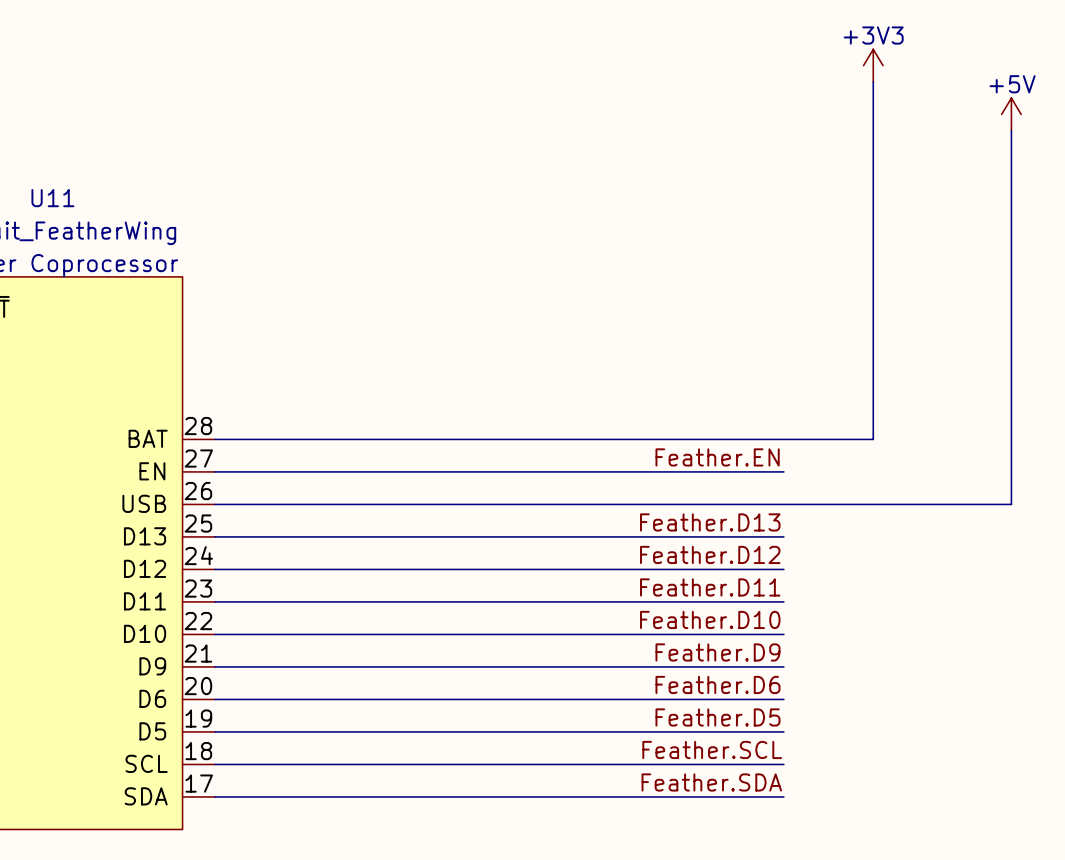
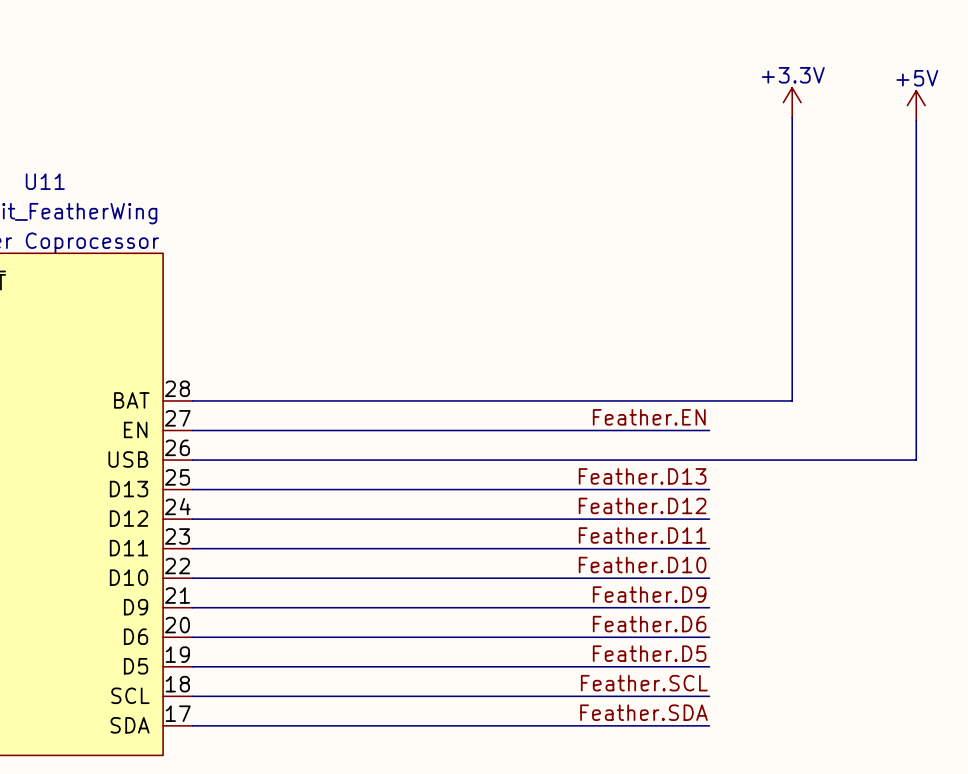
power symbol: +3V3 (873, 65) -> none
wire: (873, 81) (873, 439) -> (792, 117) (790, 400)
power symbol: none -> +3.3V (792, 102)

